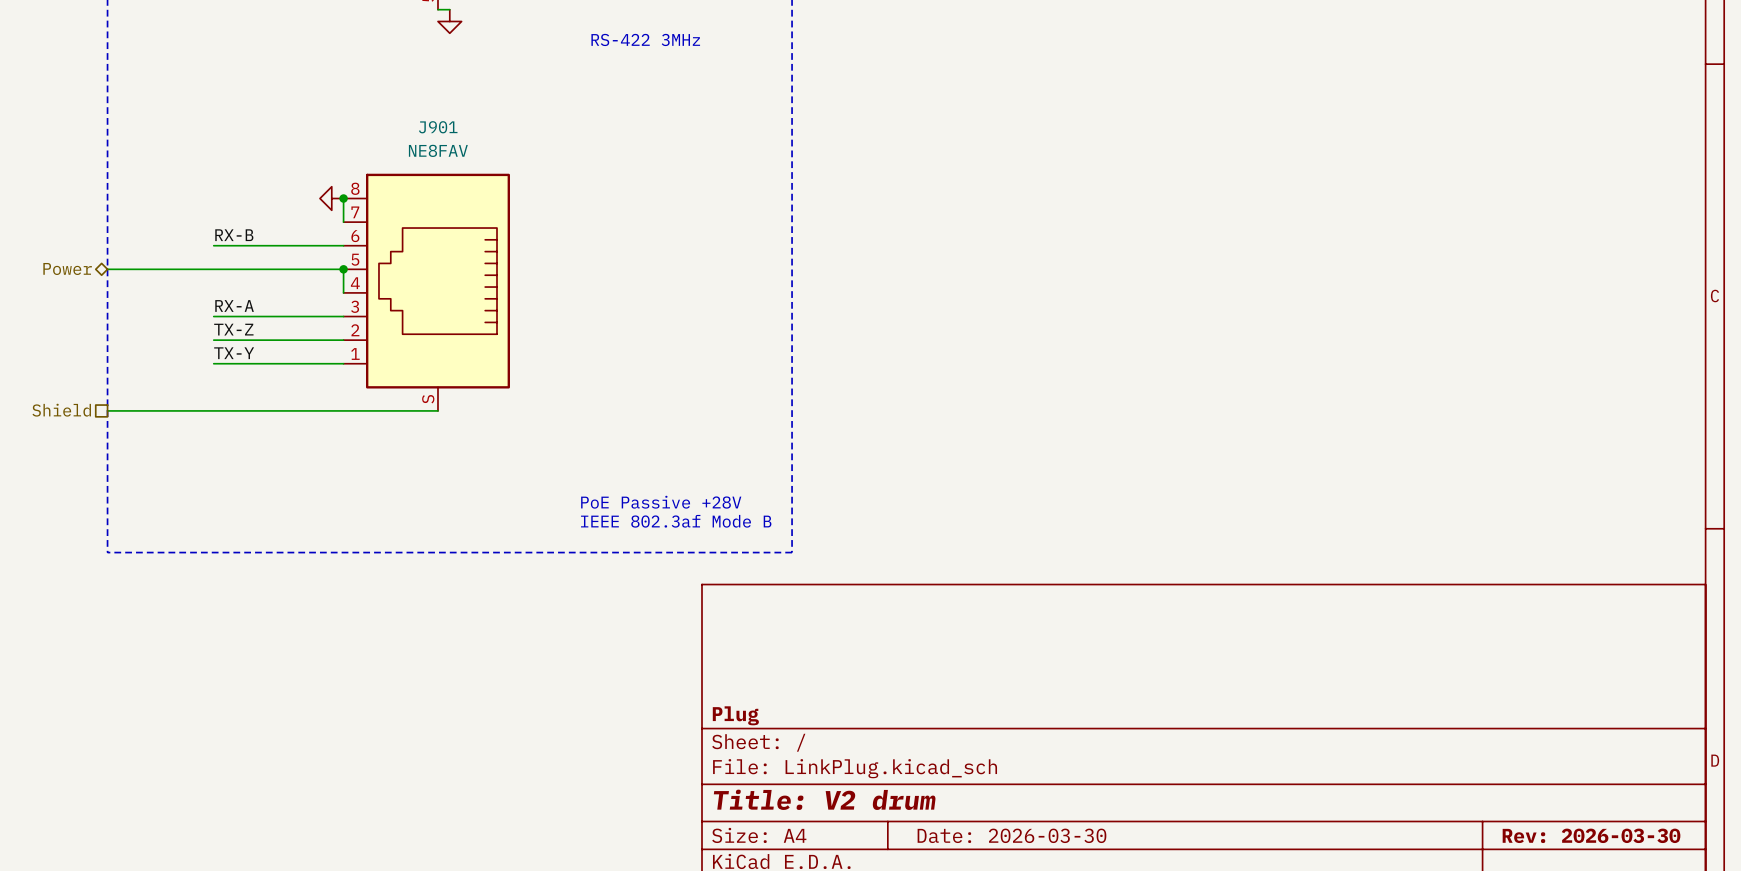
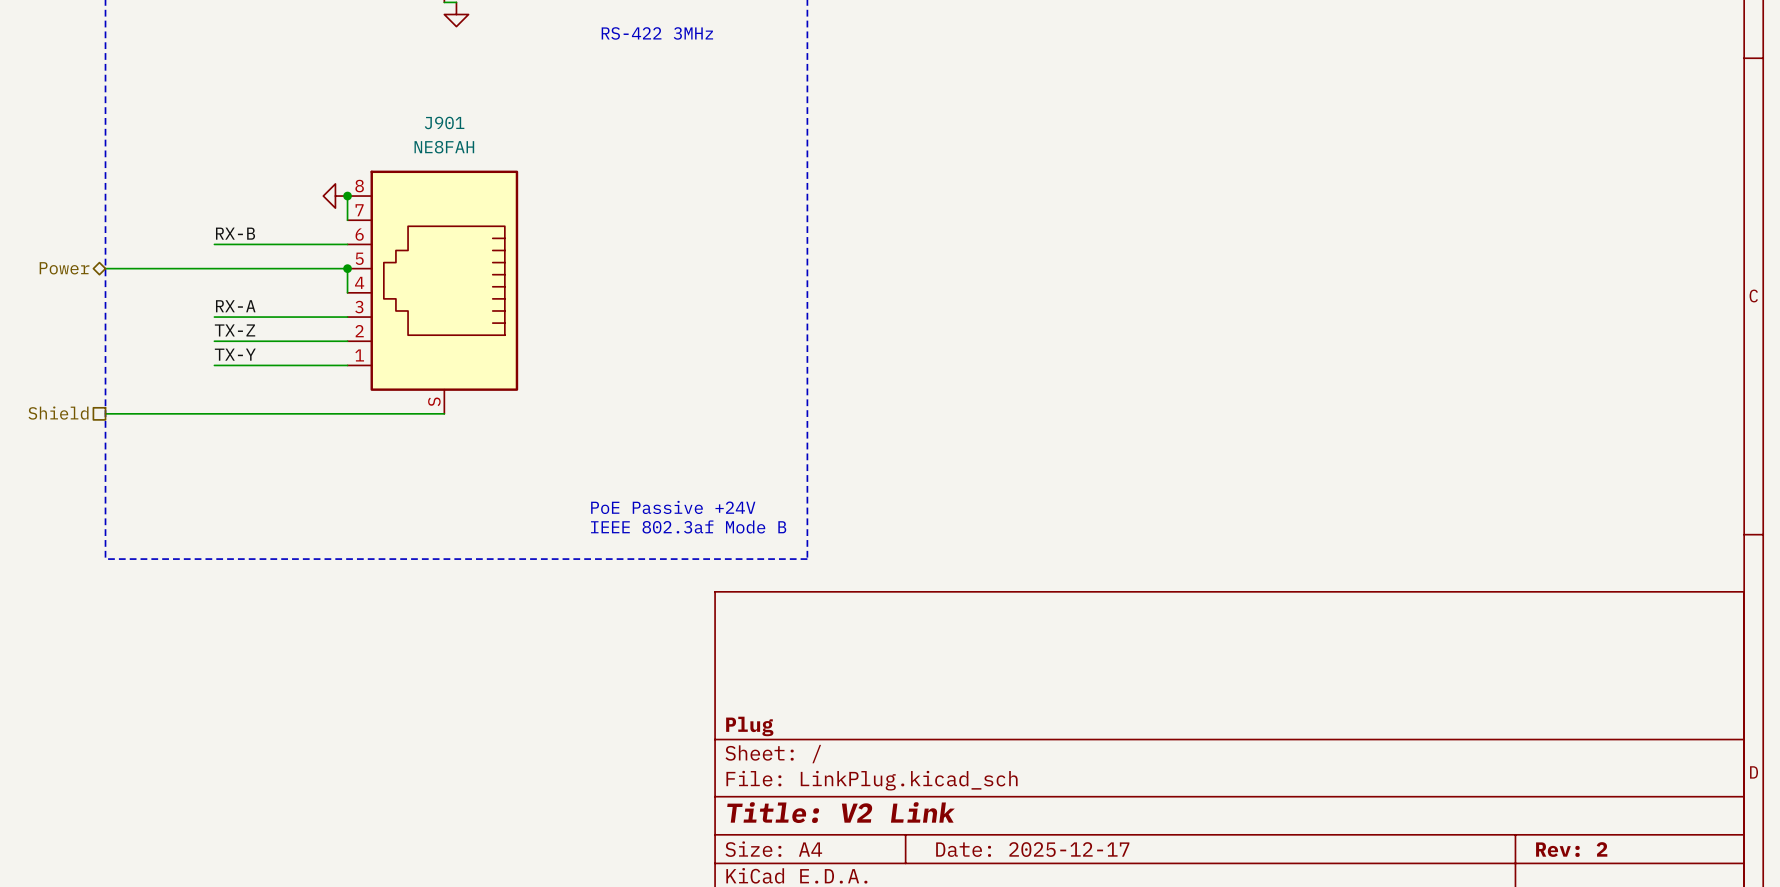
J901 value: NE8FAV (438, 150) -> NE8FAH (444, 147)
text: PoE Passive +28V (661, 502) -> PoE Passive +24V (673, 507)
title block: Title: V2 drum (824, 799) -> Title: V2 Link (841, 812)
title block: Date: 2026-03-30 (1011, 835) -> Date: 2025-12-17 (1032, 849)
title block: Rev: 2026-03-30 (1591, 835) -> Rev: 2 (1571, 849)

